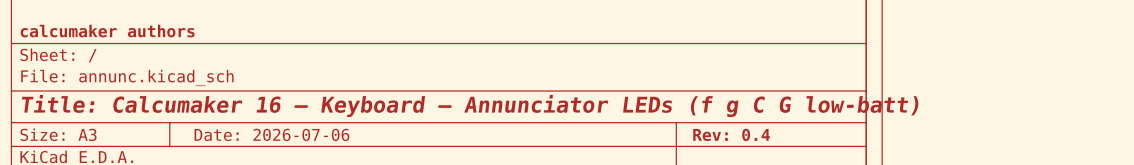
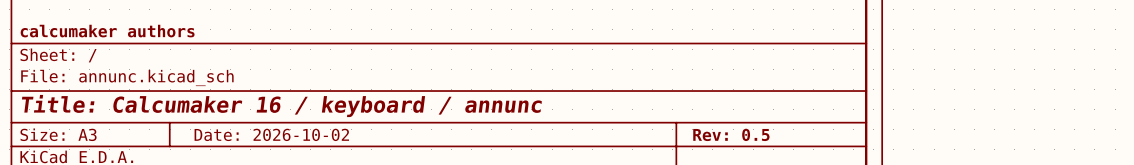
title block: Title: Calcumaker 16 — Keyboard — Annunciator LEDs (f g C G low-batt) (470, 106) -> Title: Calcumaker 16 / keyboard / annunc (281, 106)
title block: Date: 2026-07-06 (271, 134) -> Date: 2026-10-02 (271, 134)
title block: Rev: 0.4 (731, 134) -> Rev: 0.5 (731, 134)

